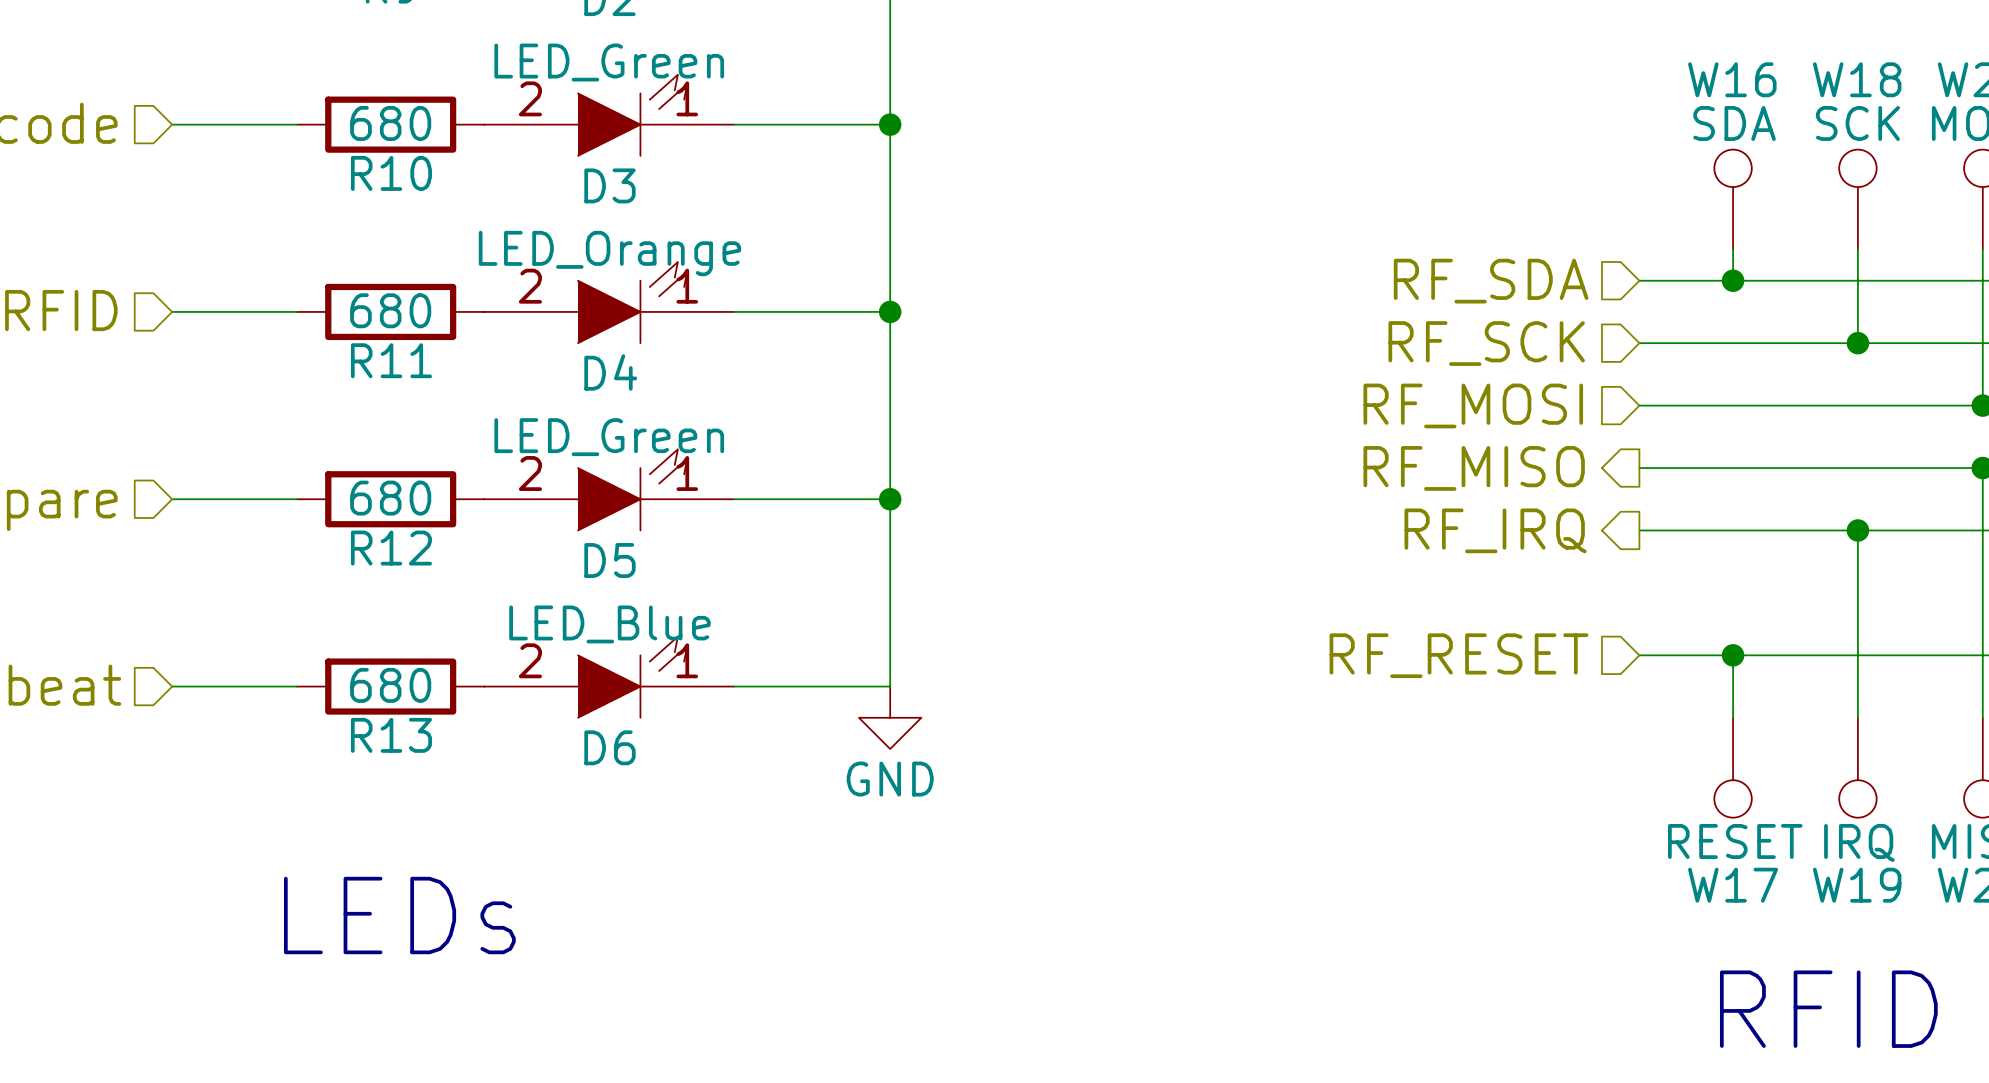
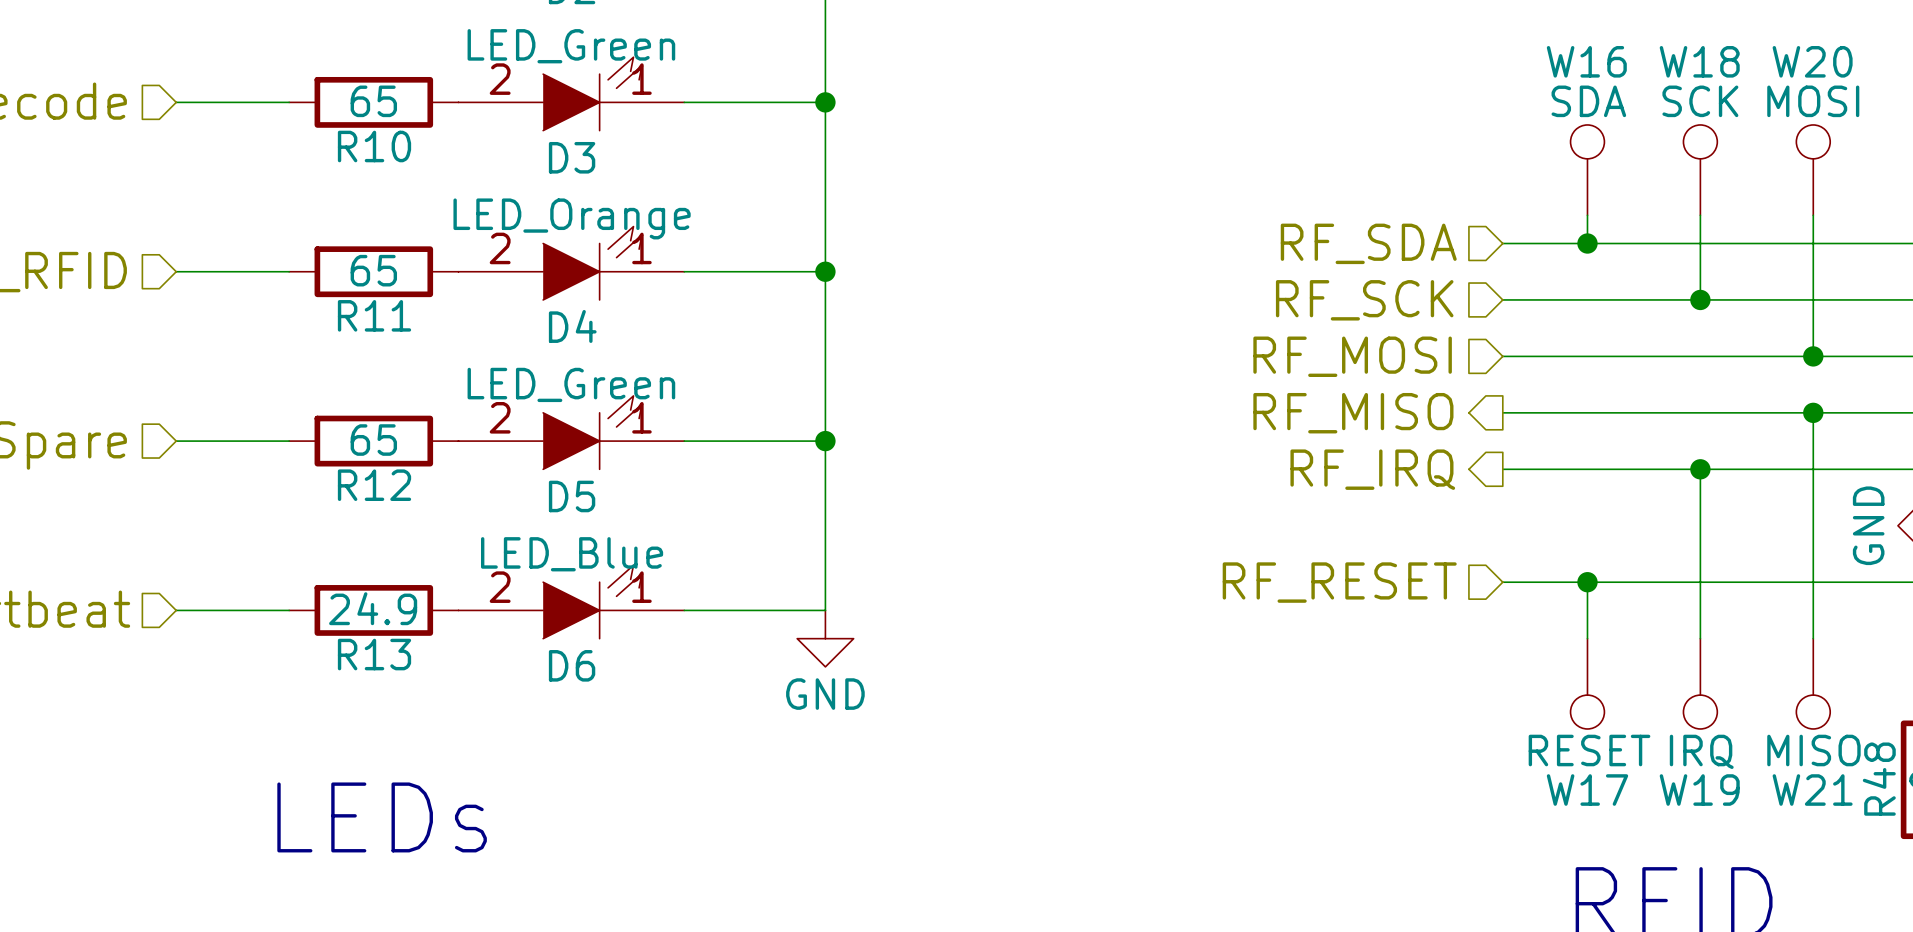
R10 value: 680 (390, 123) -> 65 (373, 101)
R11 value: 680 (390, 310) -> 65 (373, 270)
R12 value: 680 (390, 498) -> 65 (373, 440)
R13 value: 680 (390, 685) -> 24.9 (373, 608)

